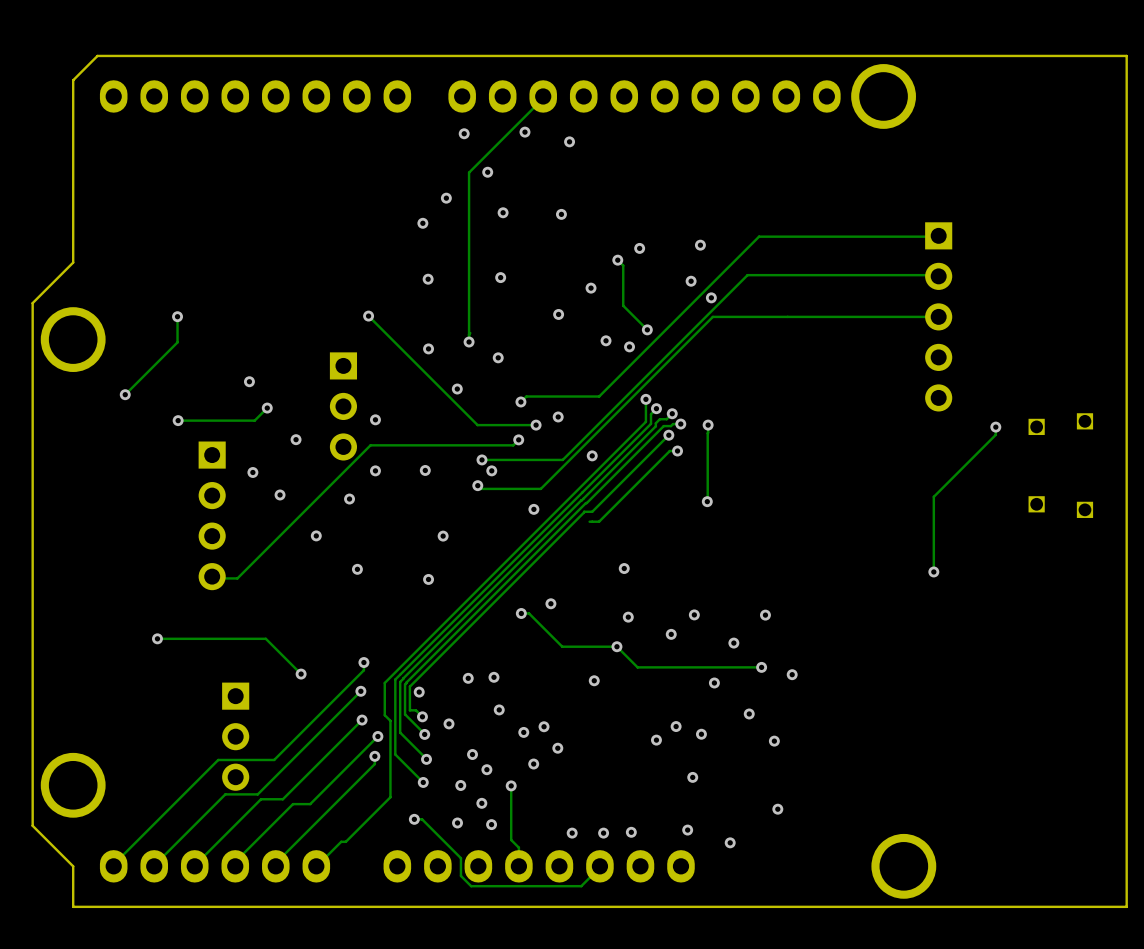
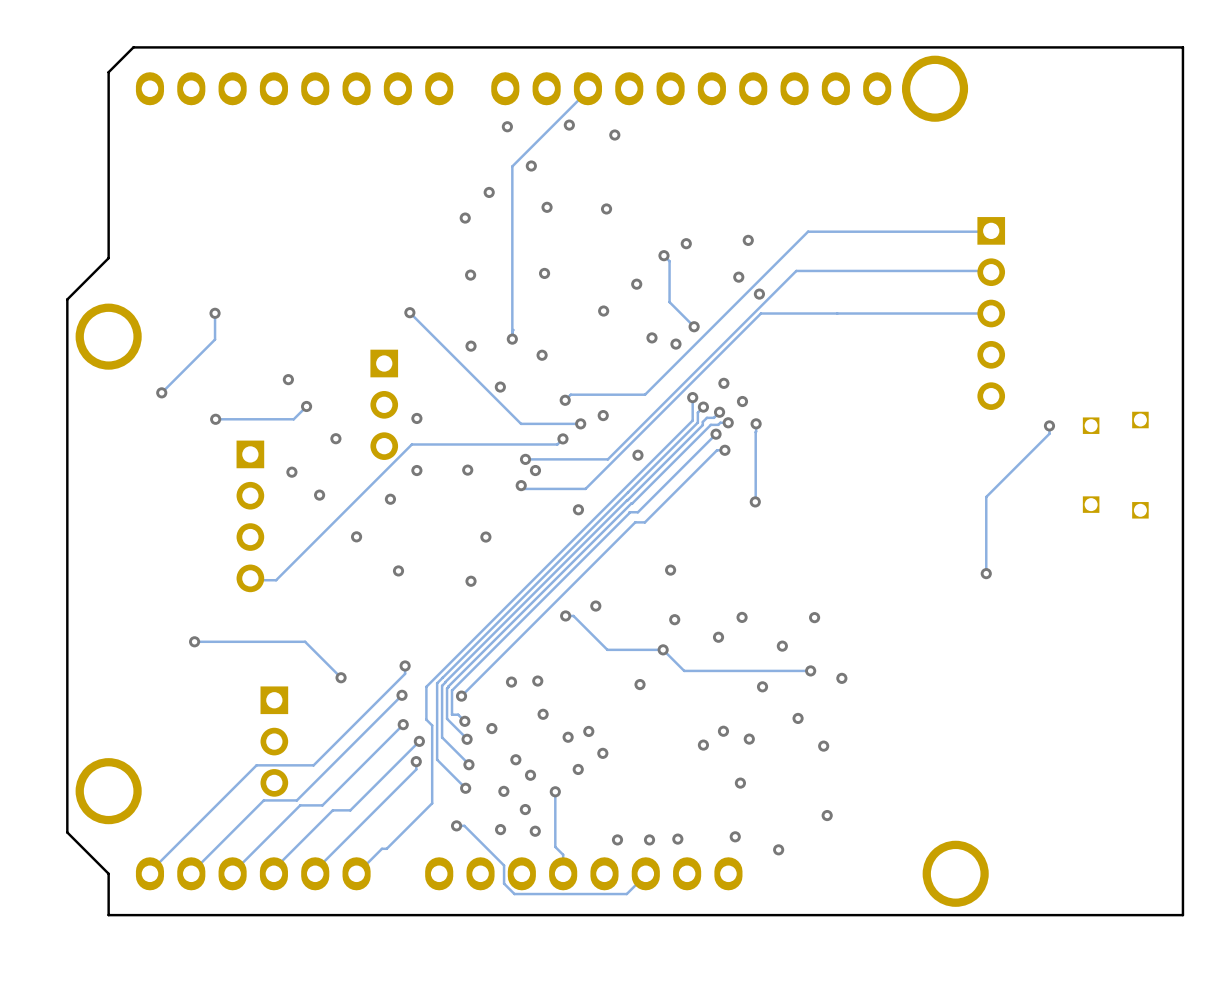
via: none -> (723, 383)
via: none -> (742, 401)
track: none -> (635, 522) (461, 696)

